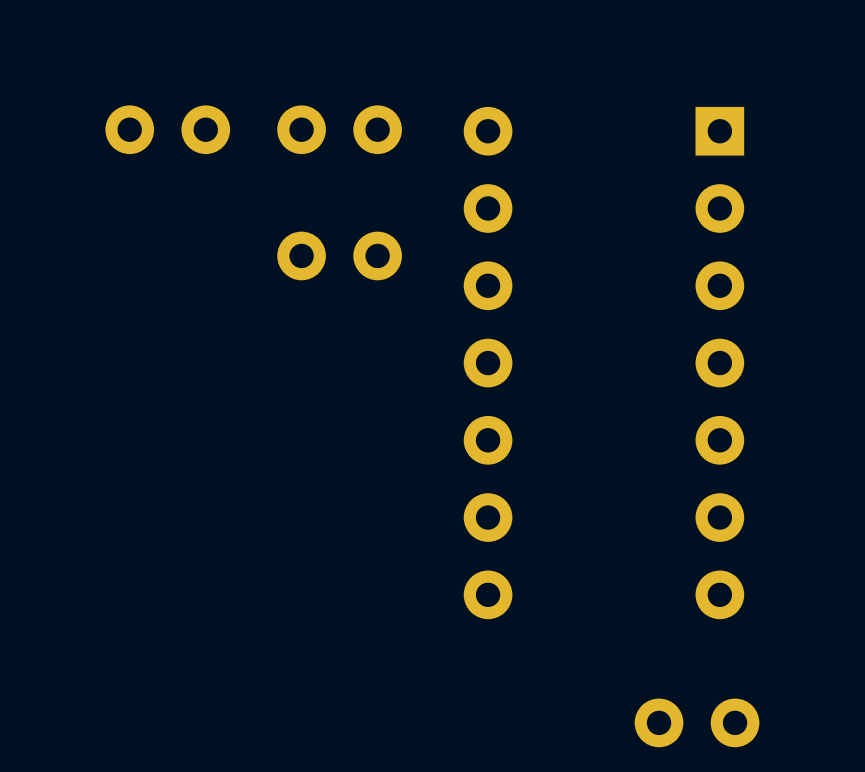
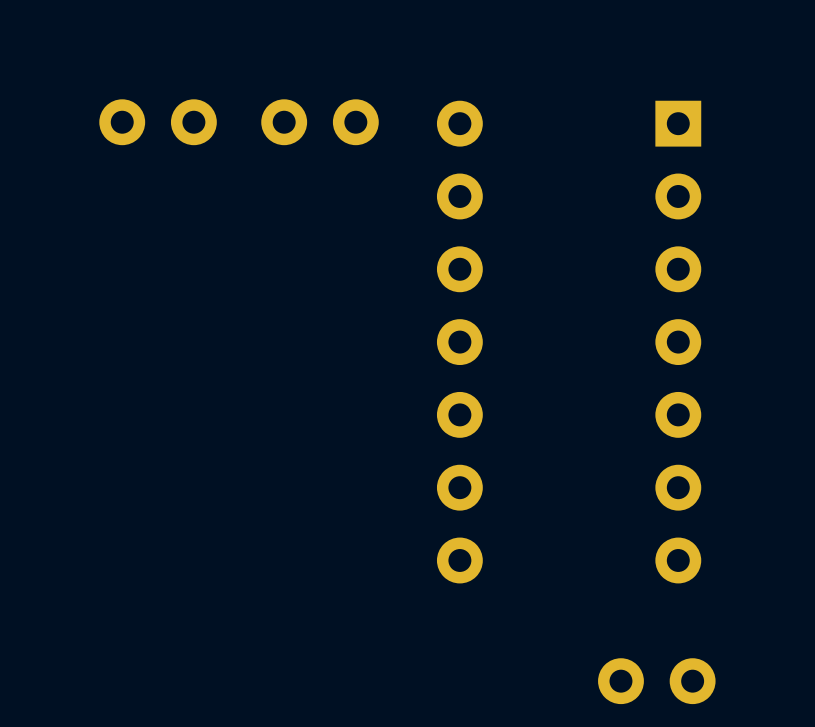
part: (339, 255) -> none

